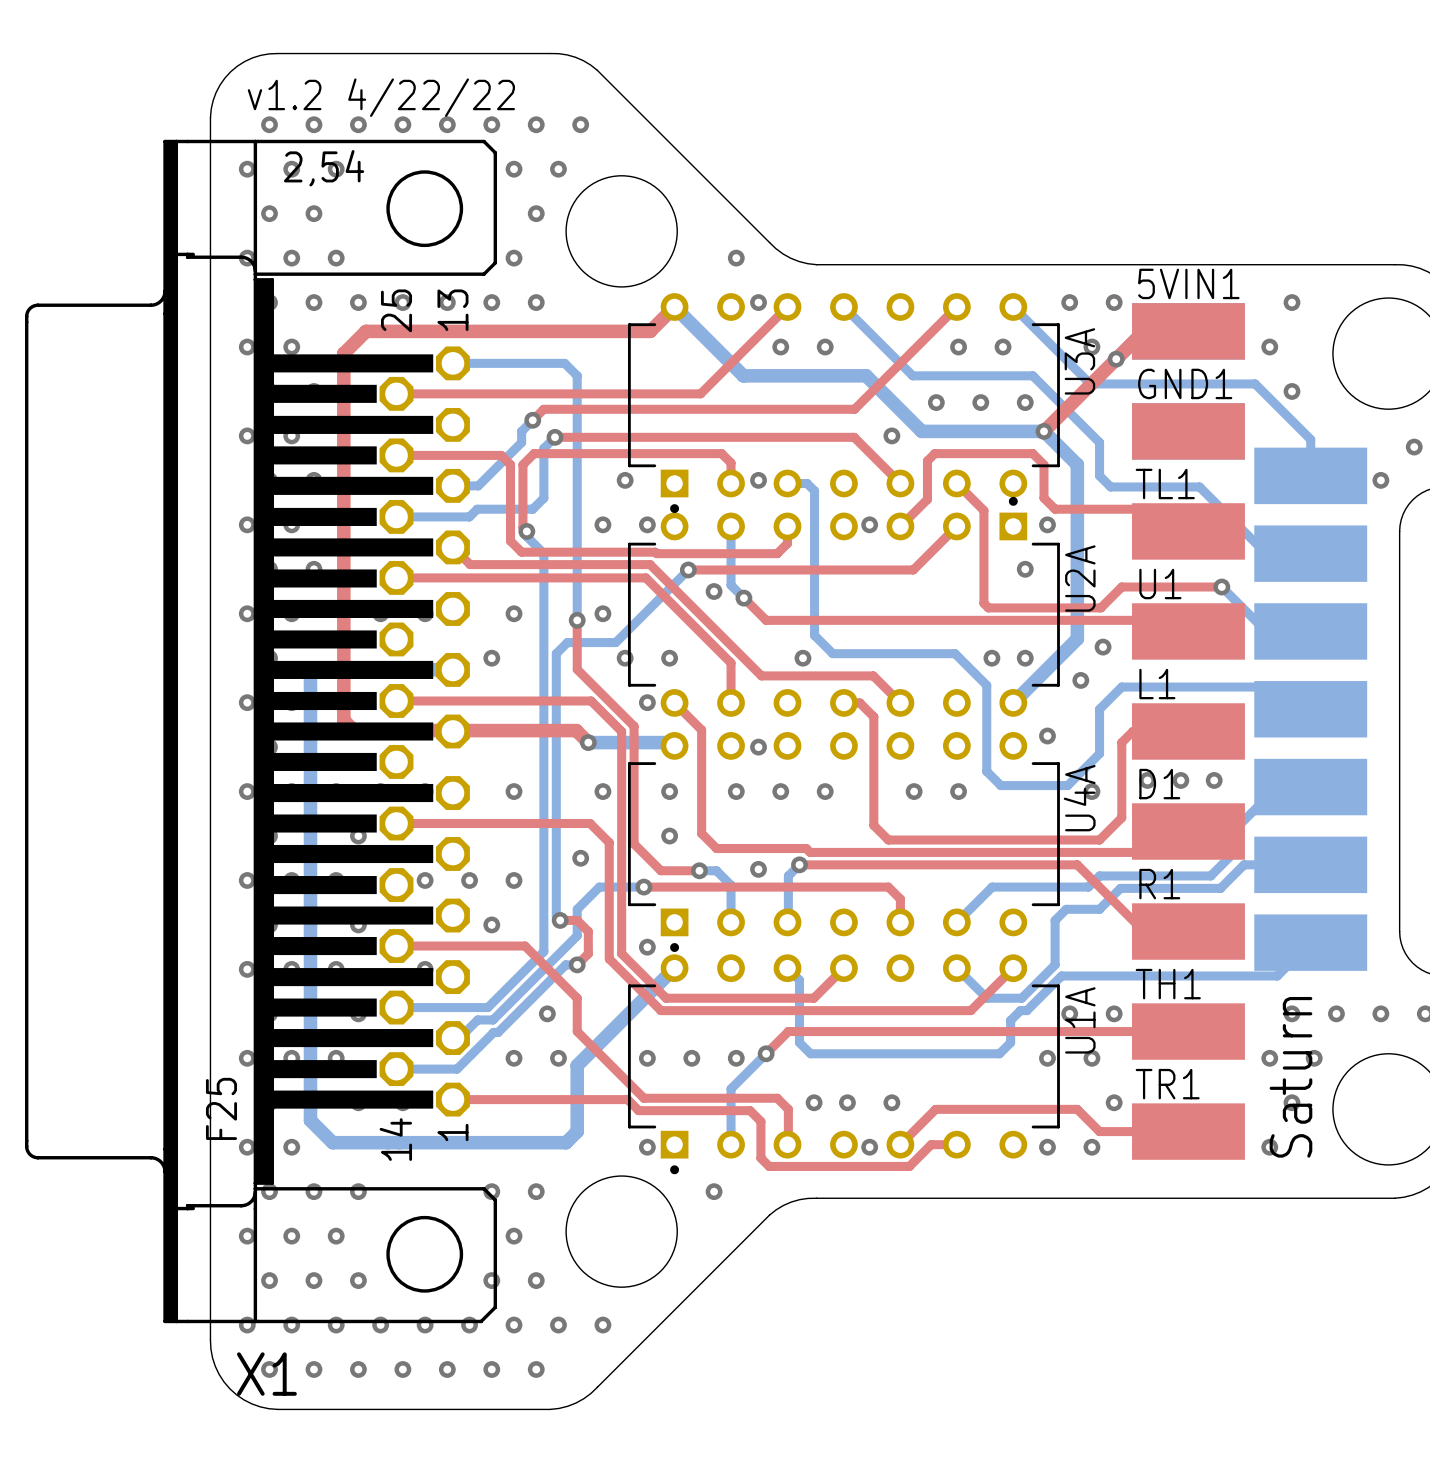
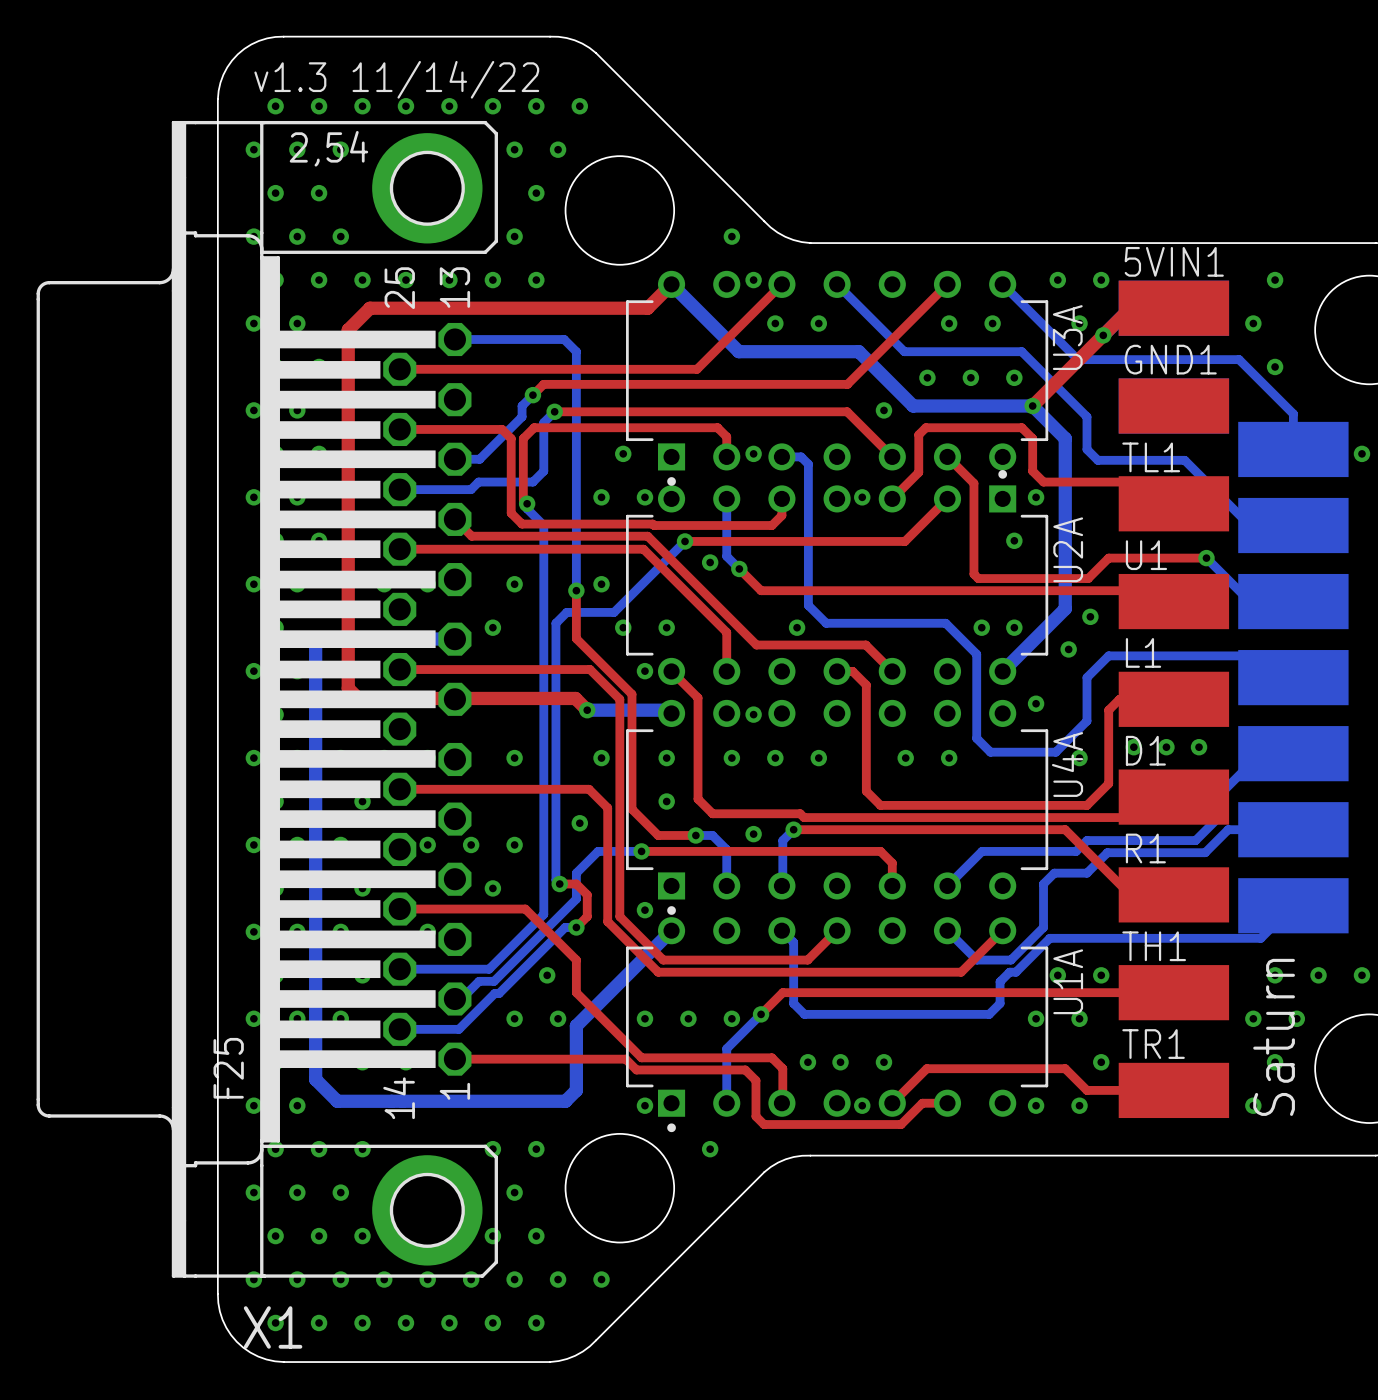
text: v1.2 4/22/22 (381, 97) -> v1.3 11/14/22 (396, 79)
X1 footprint: [25, 139, 498, 1324] -> [36, 120, 498, 1278]

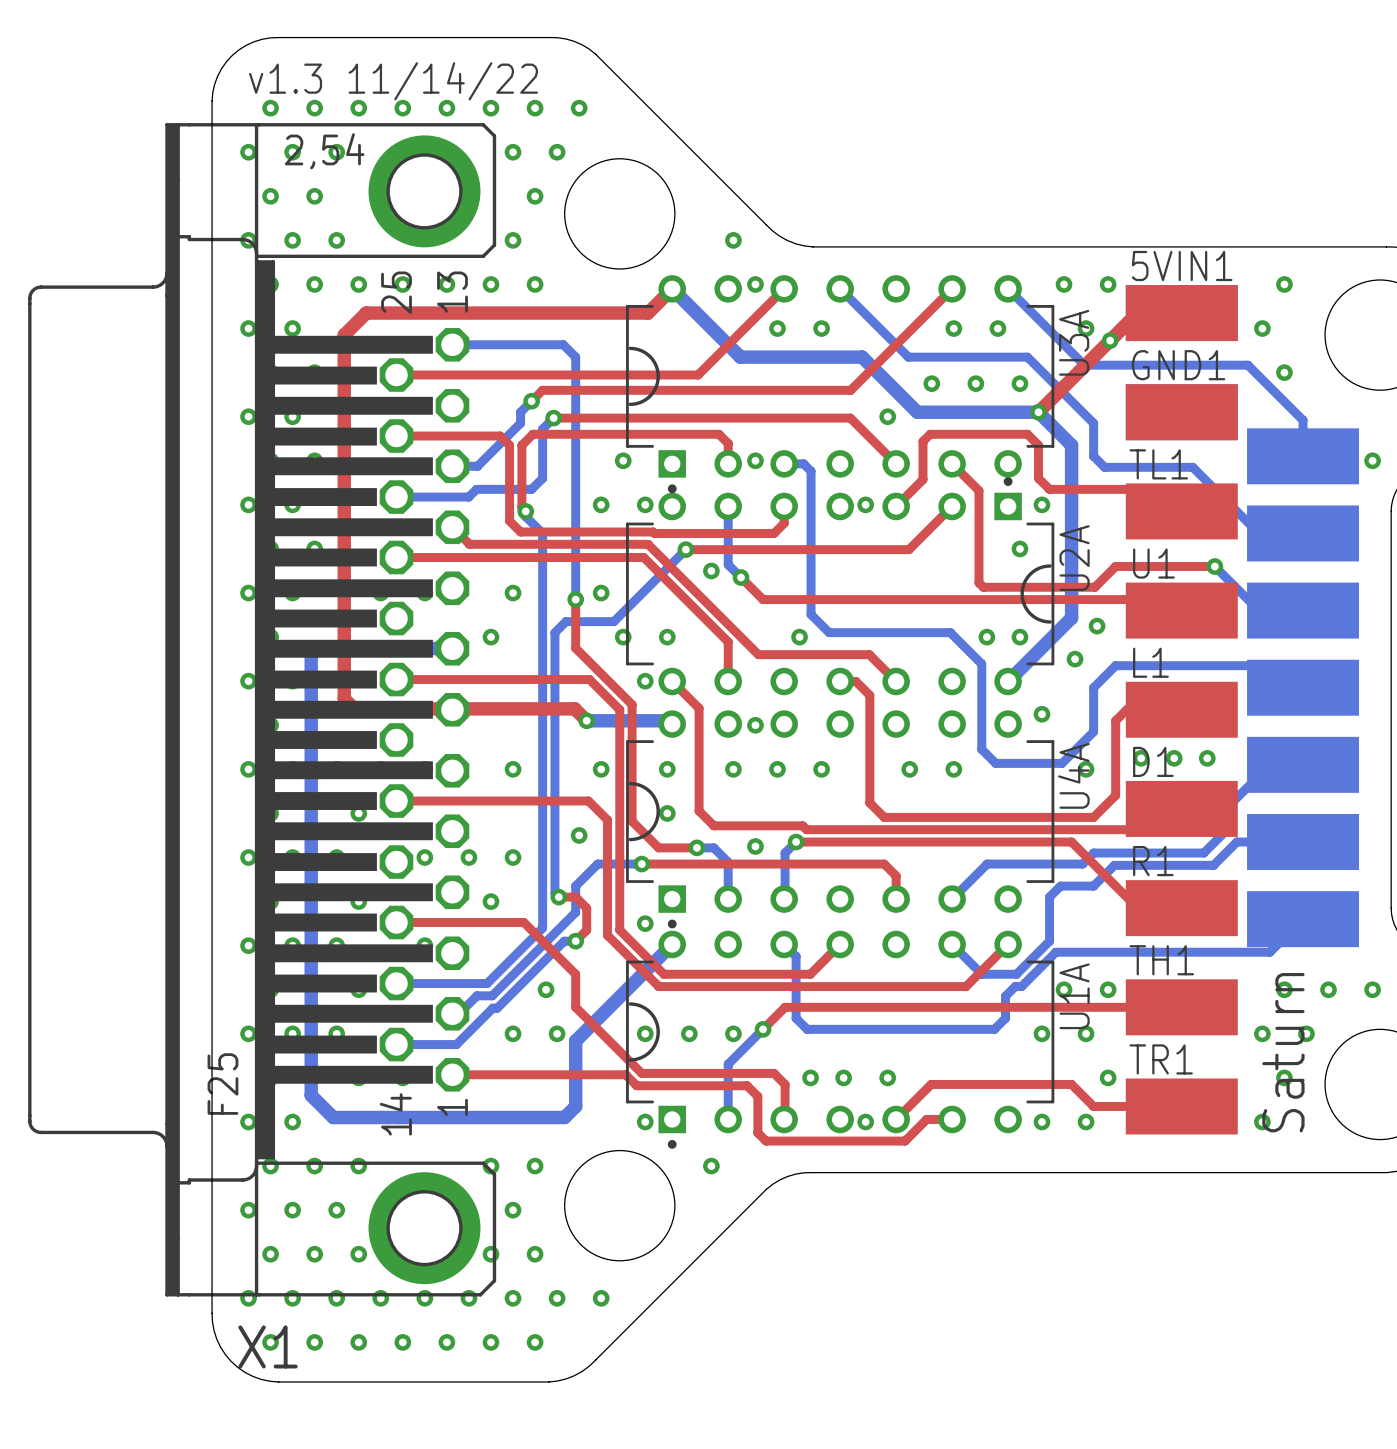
U3A footprint: [626, 270, 1049, 486] -> [626, 275, 1055, 494]
U2A footprint: [626, 470, 1049, 685] -> [626, 477, 1055, 696]
U4A footprint: [626, 699, 1049, 915] -> [626, 710, 1055, 929]
U1A footprint: [626, 917, 1049, 1133] -> [626, 930, 1055, 1149]

